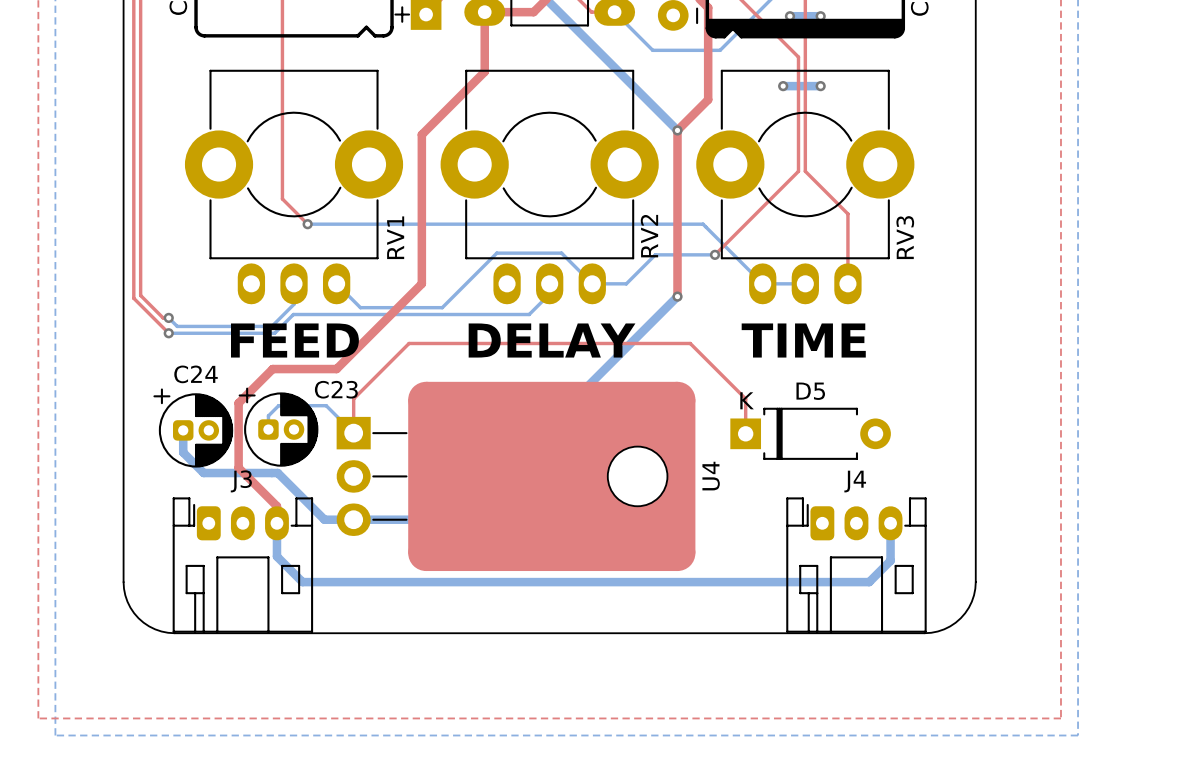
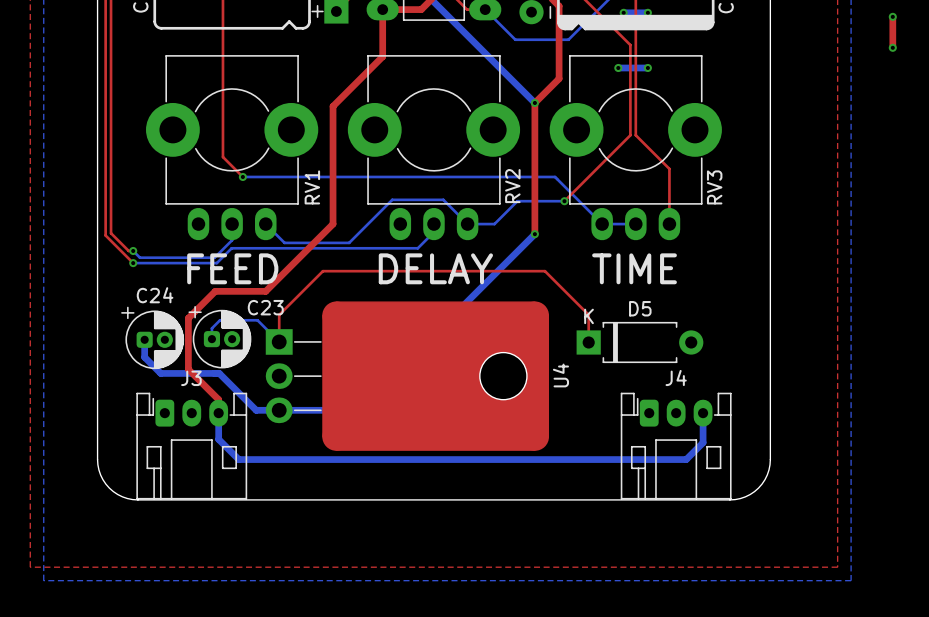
top track: none -> (892, 16) (892, 47)
via: none -> (892, 16)
via: none -> (892, 47)

